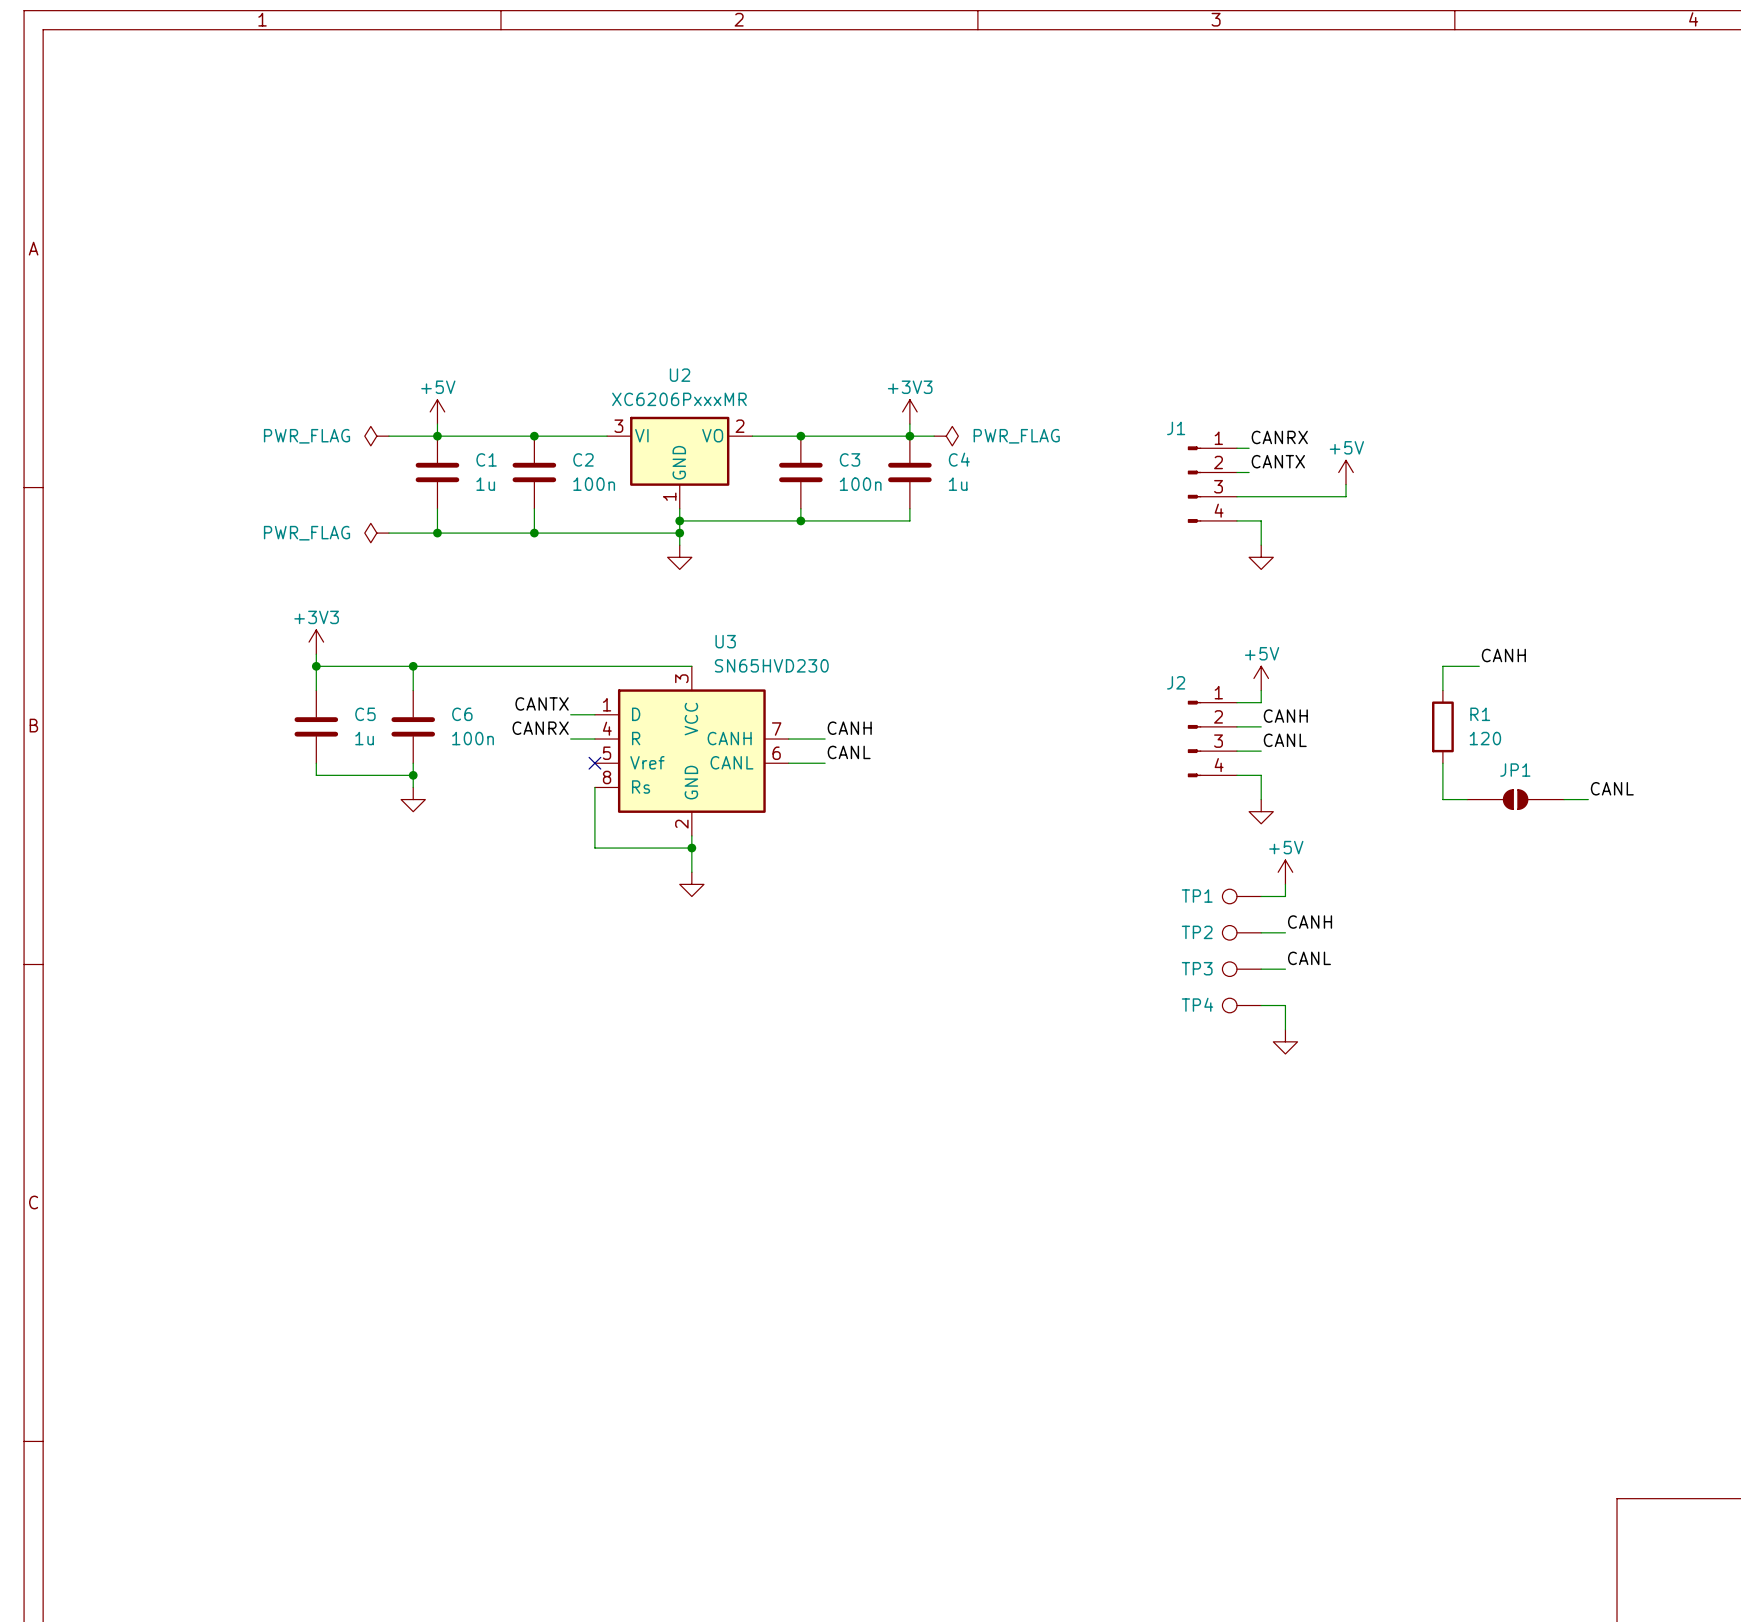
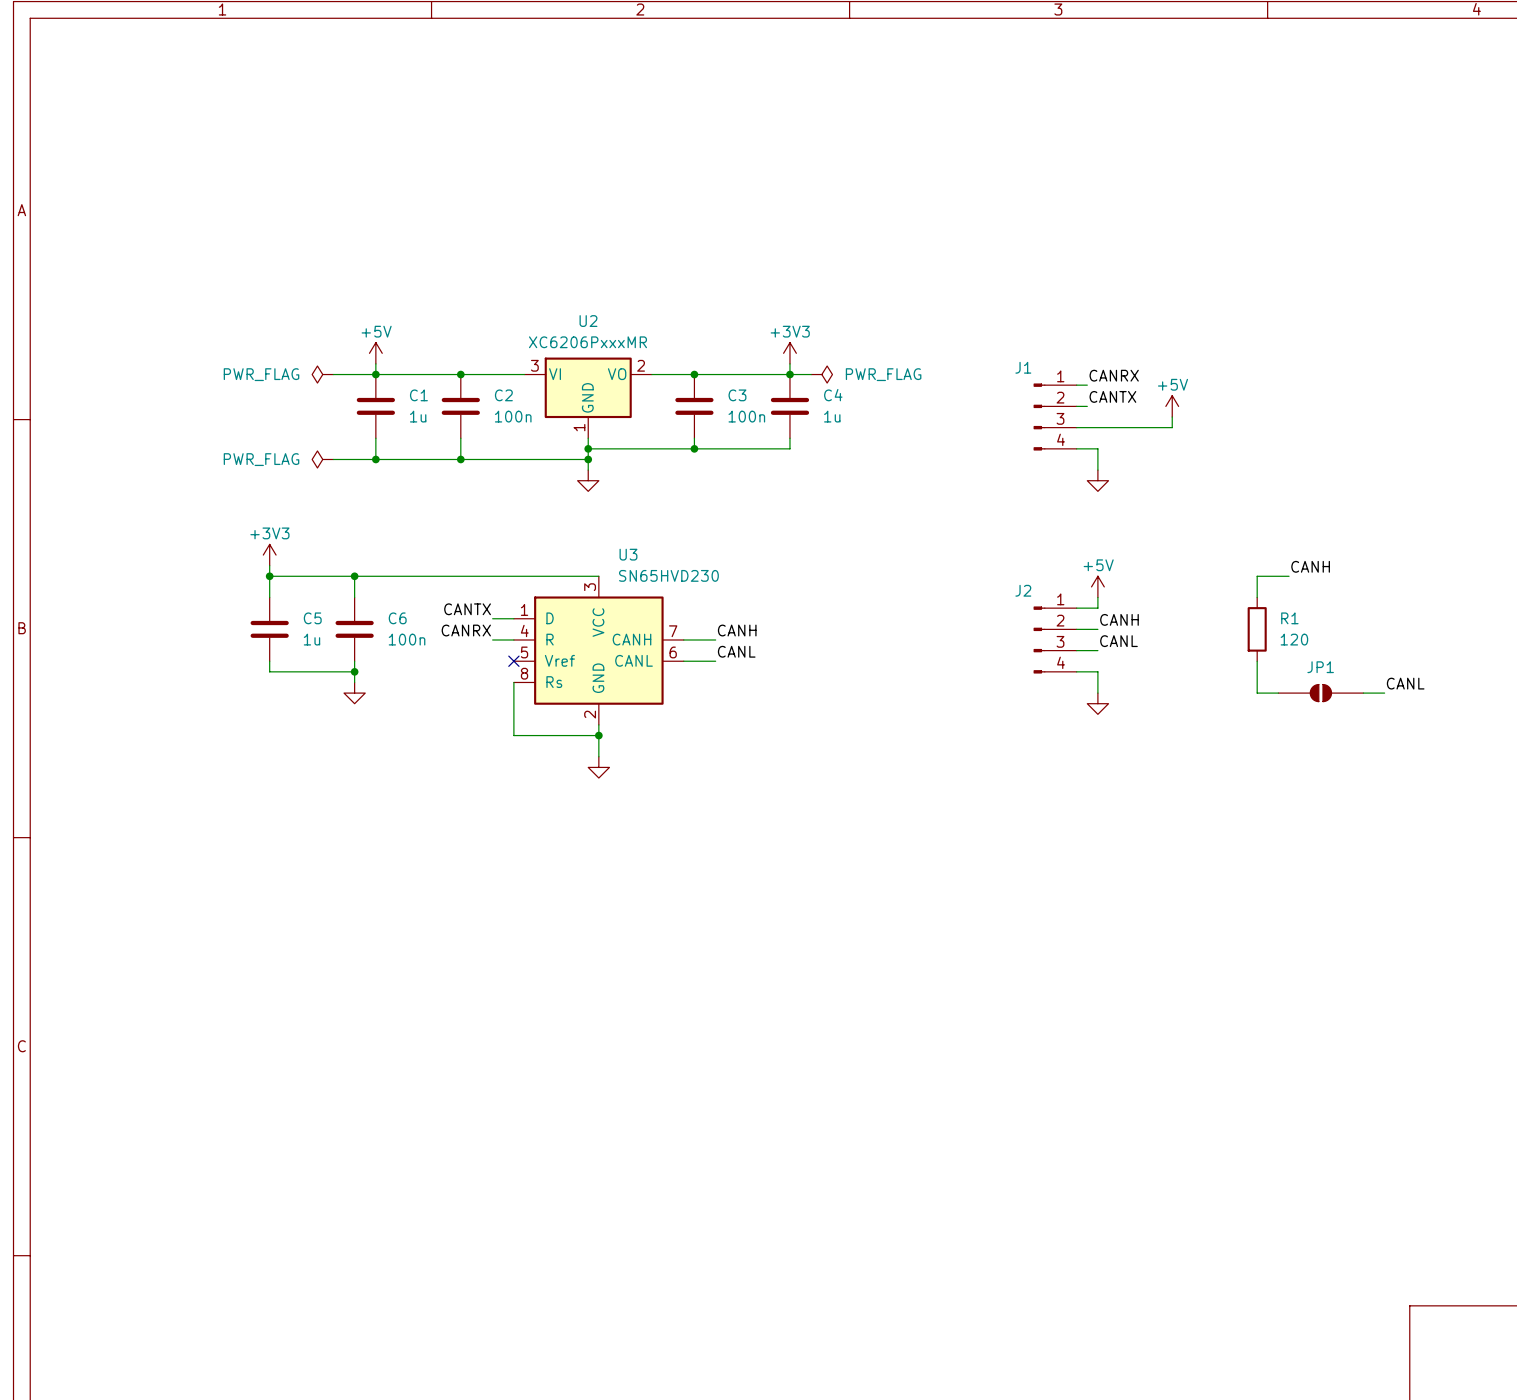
power symbol: +5V (1285, 872) -> none
wire: (1285, 884) (1285, 896) (1261, 896) -> none
TP1: (1241, 896) -> none
label: CANH (1310, 922) -> none
TP2: (1241, 932) -> none
wire: (1261, 932) (1285, 932) -> none
label: CANL (1309, 958) -> none
TP3: (1241, 969) -> none
wire: (1261, 969) (1285, 969) -> none
TP4: (1241, 1005) -> none
wire: (1261, 1005) (1285, 1005) (1285, 1029) -> none
power symbol: (1285, 1041) -> none

